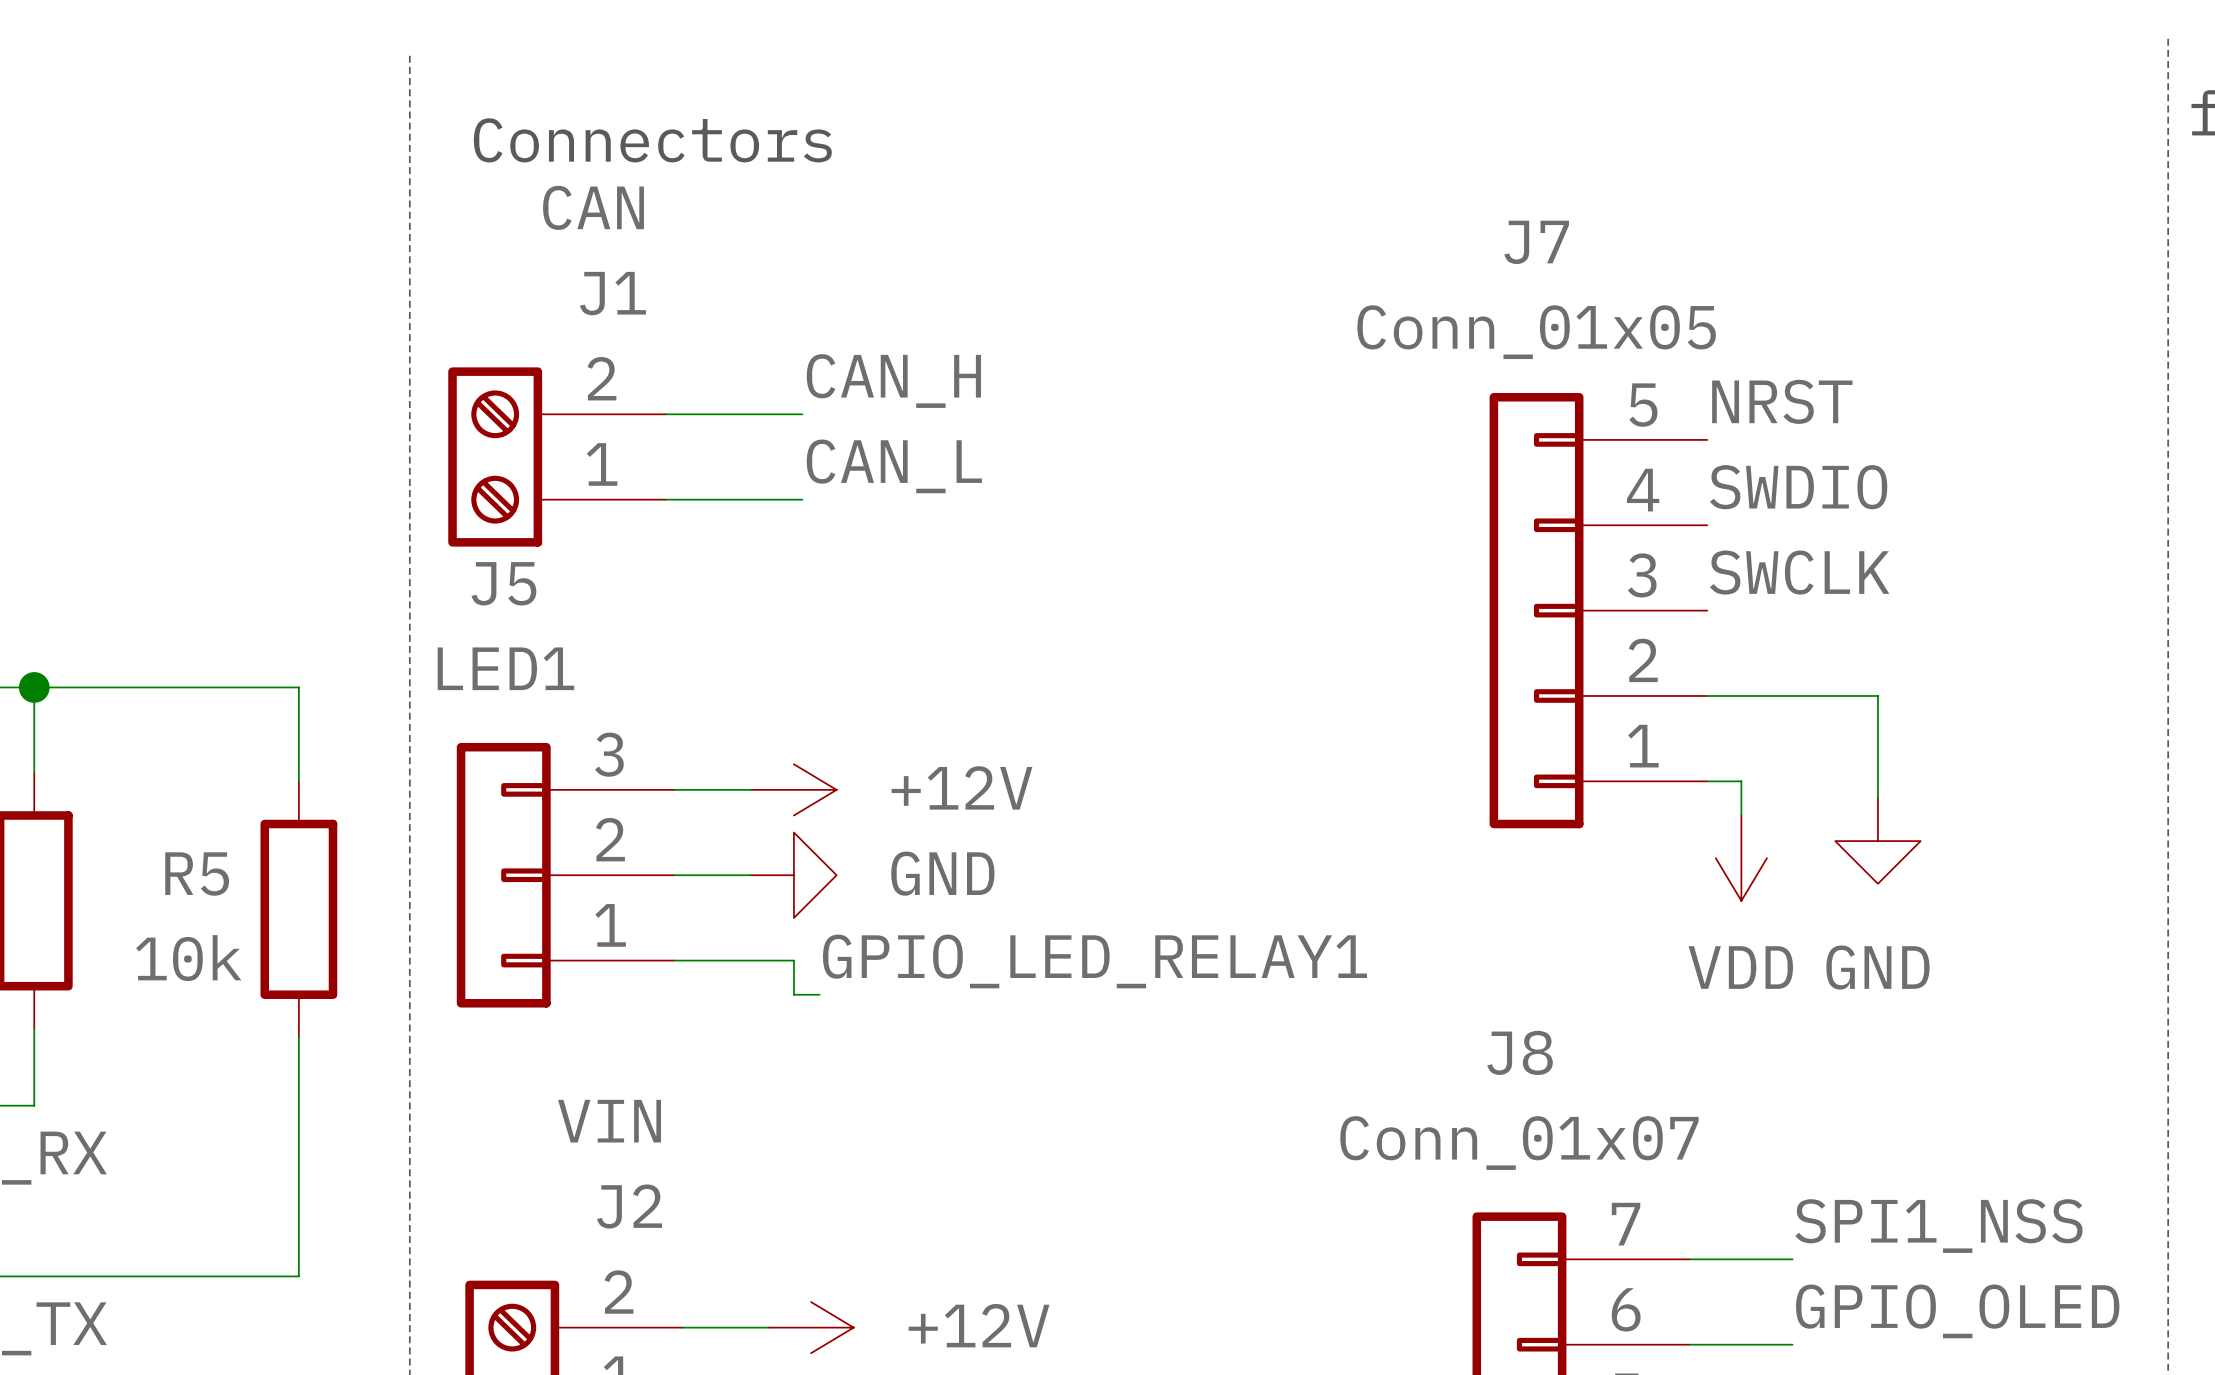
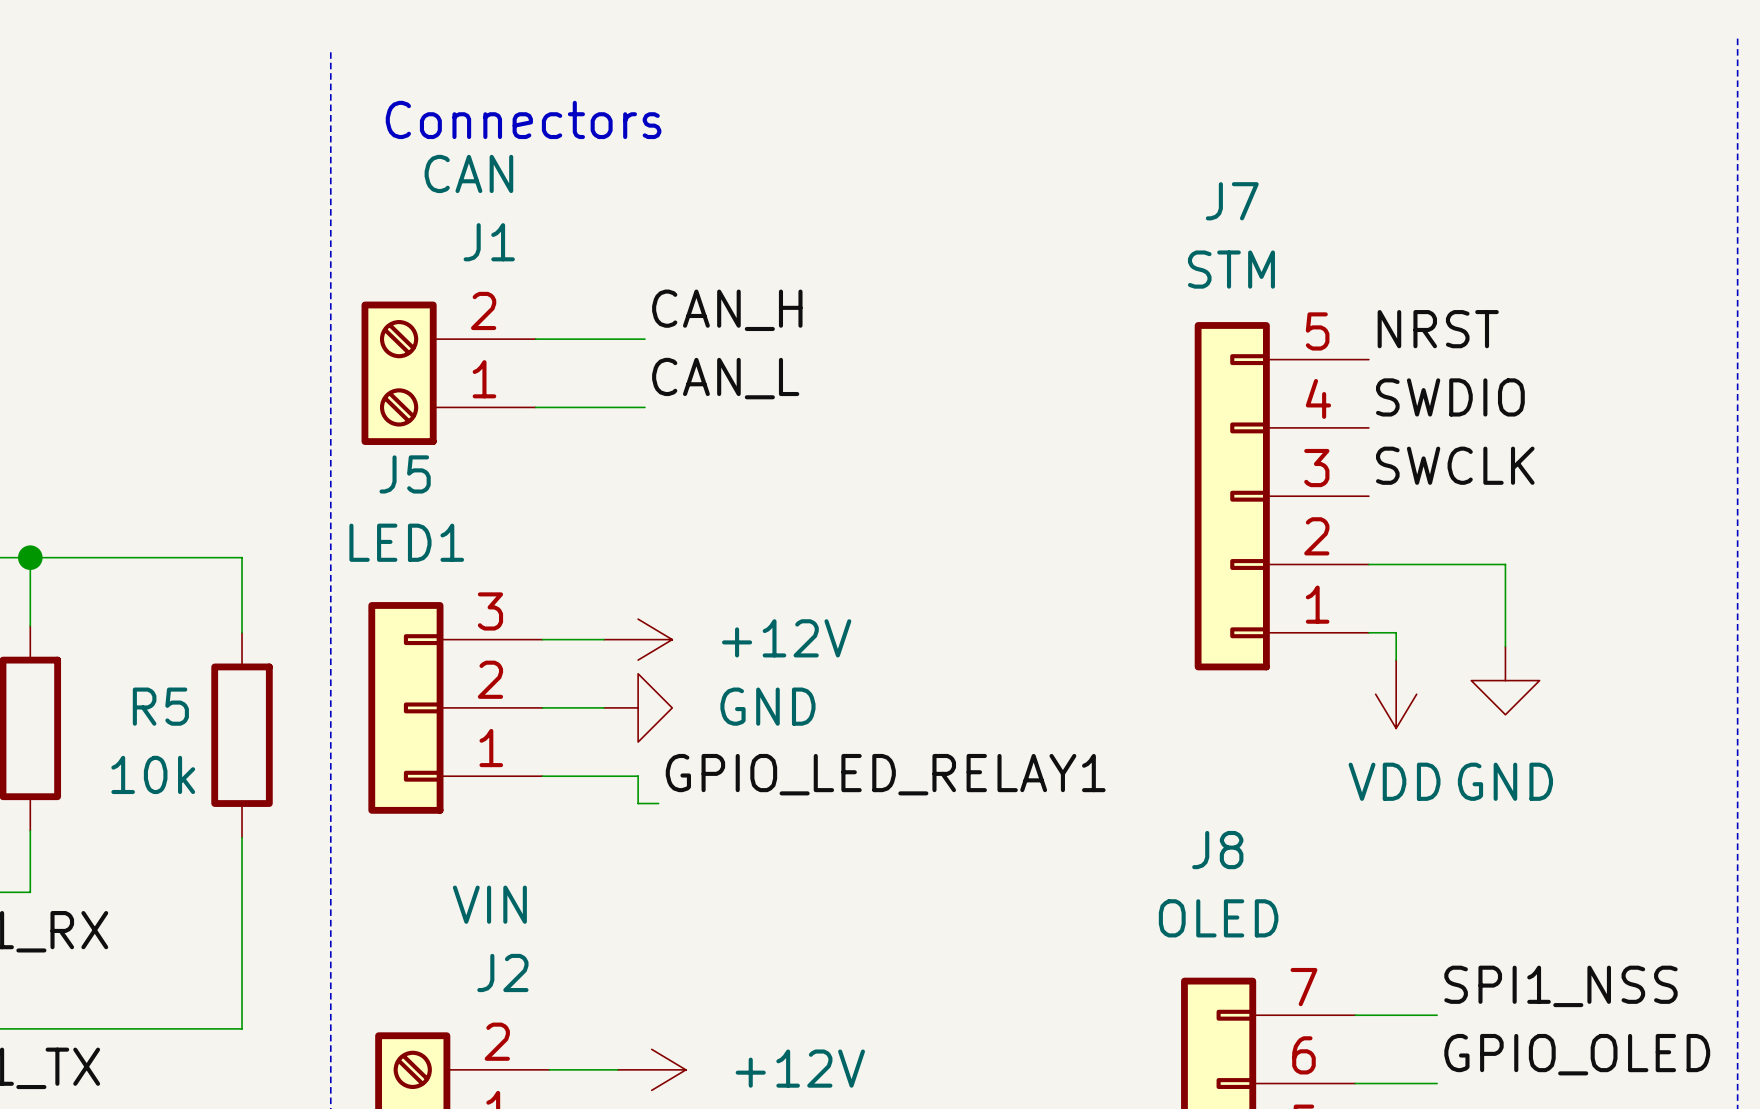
J7 value: Conn_01x05 (1536, 332) -> STM (1231, 269)
J8 value: Conn_01x07 (1519, 1143) -> OLED (1218, 918)

